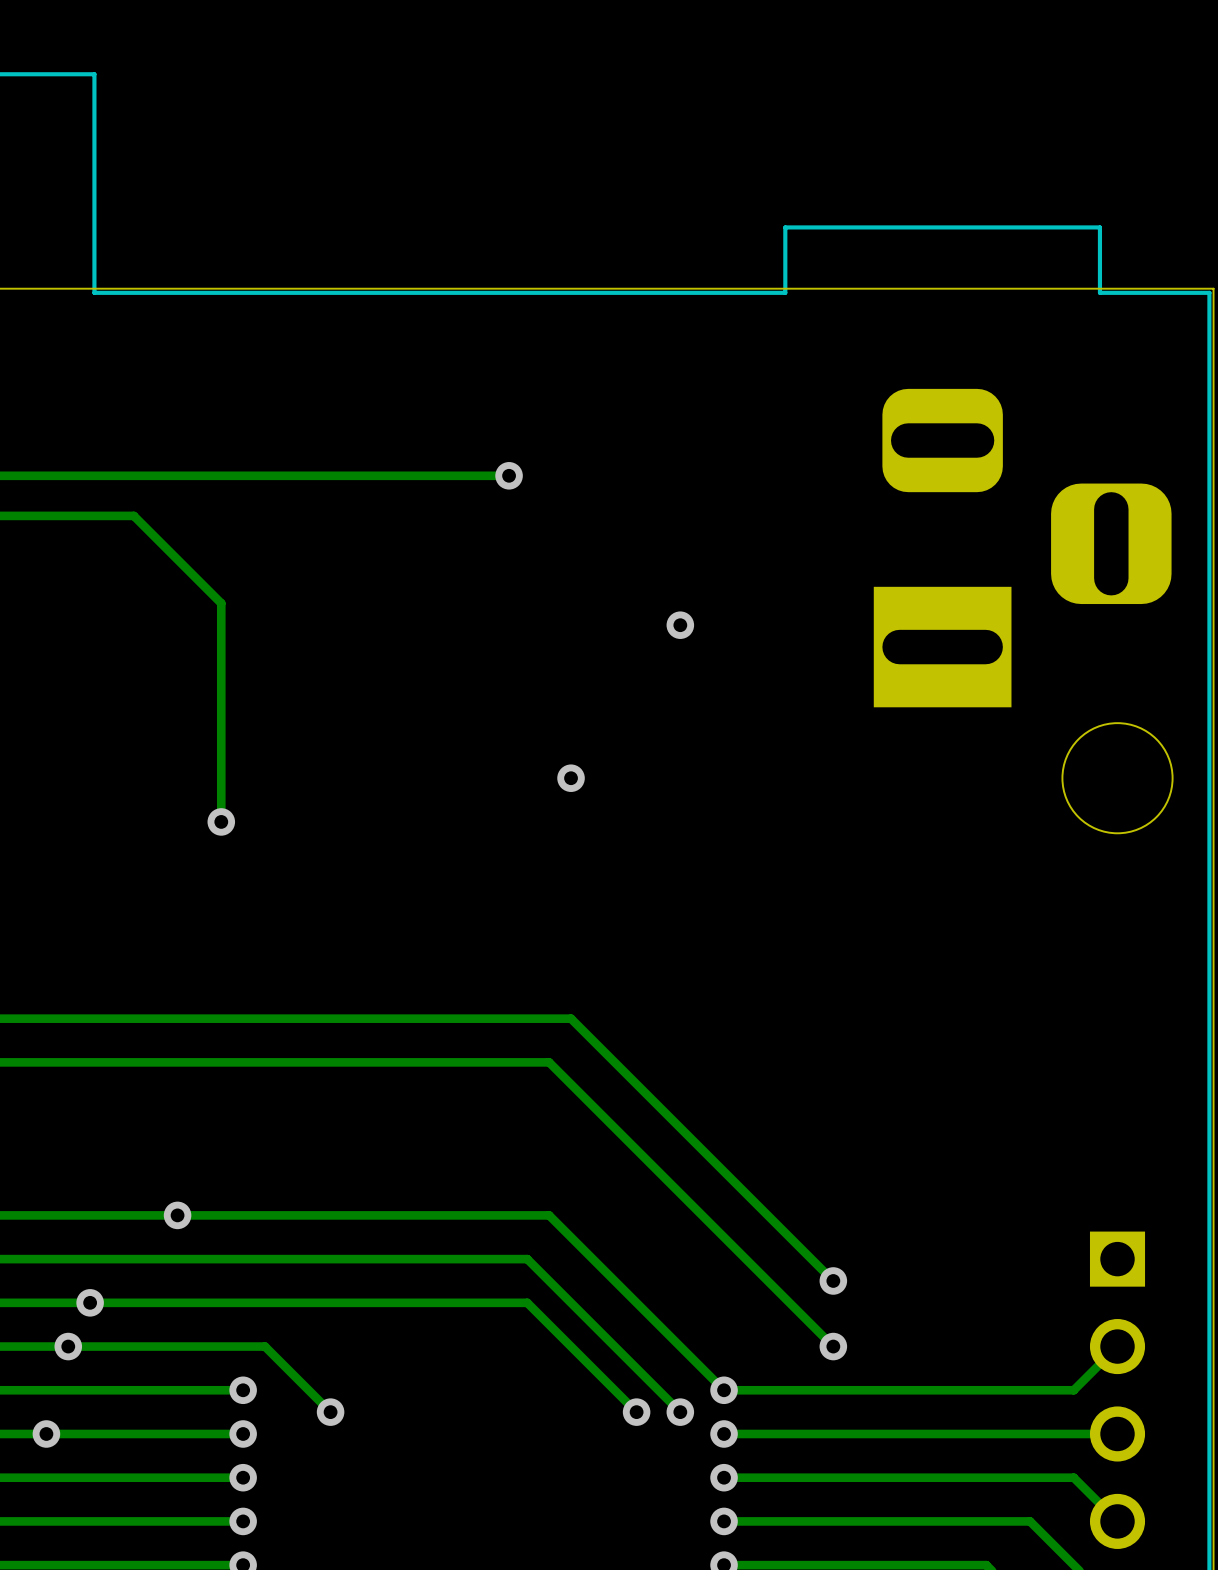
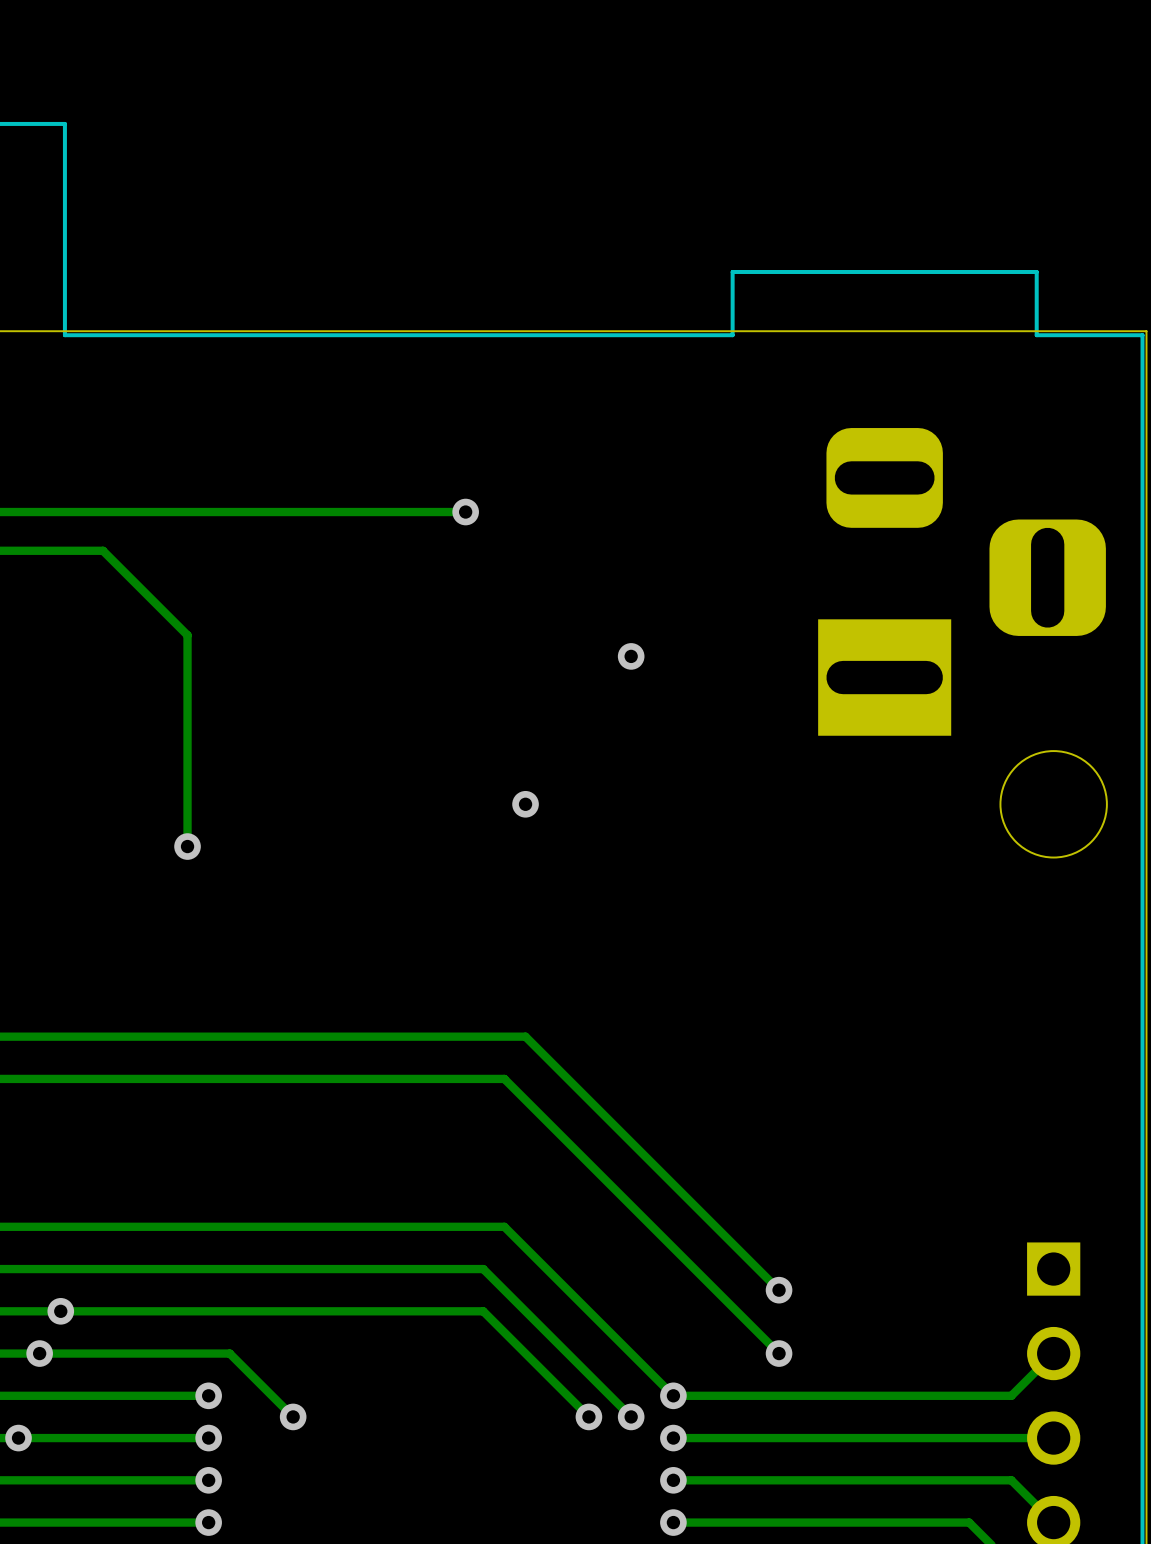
via: (177, 1215) -> none

